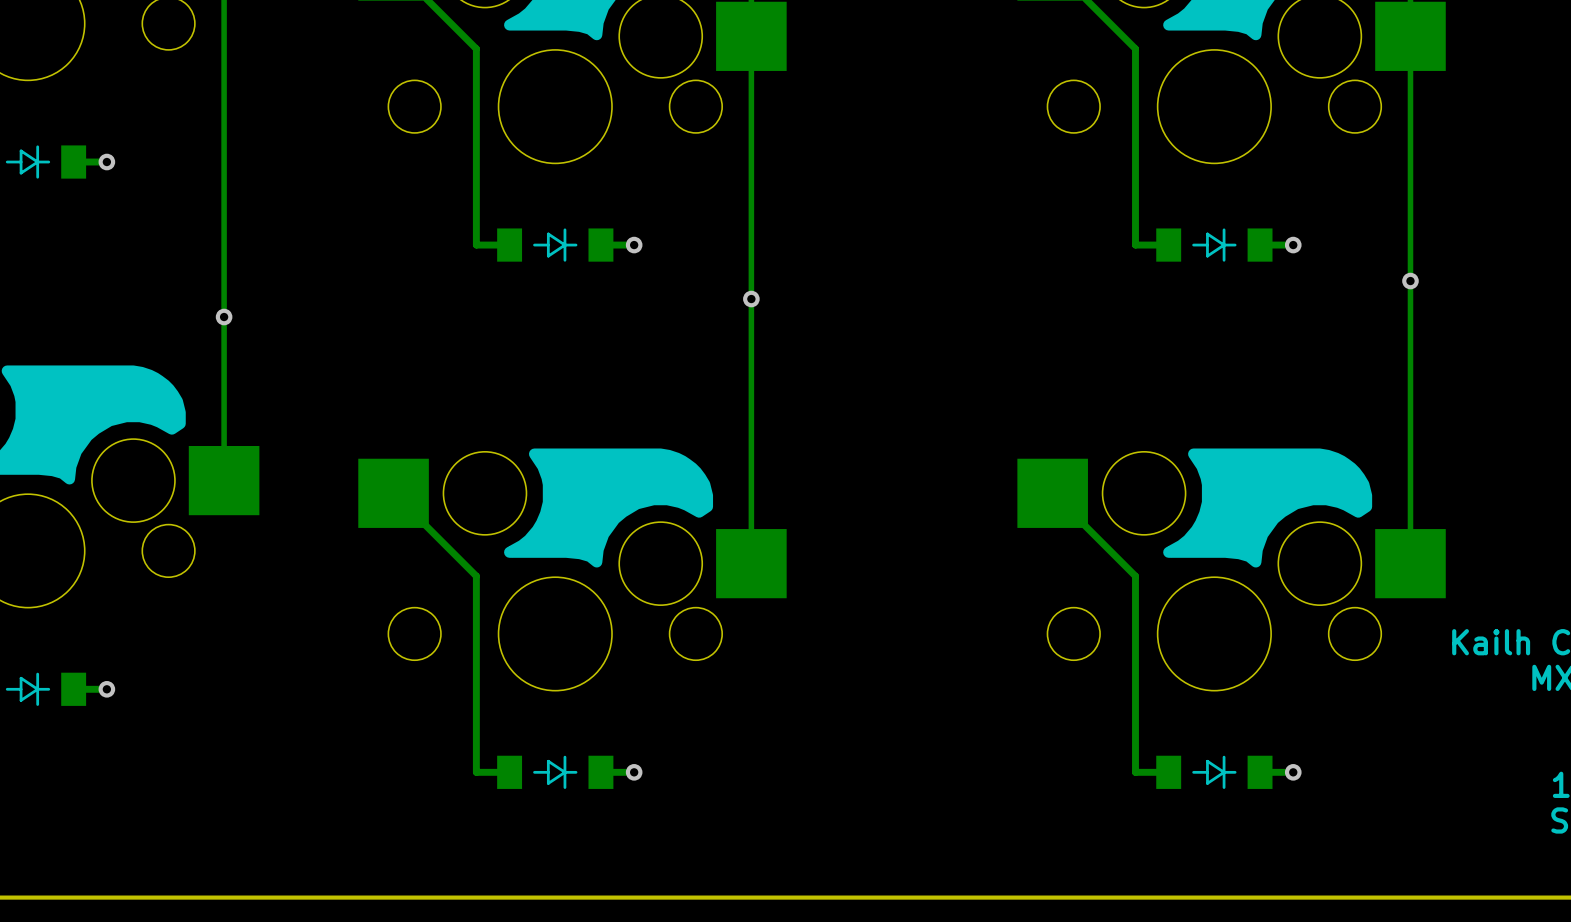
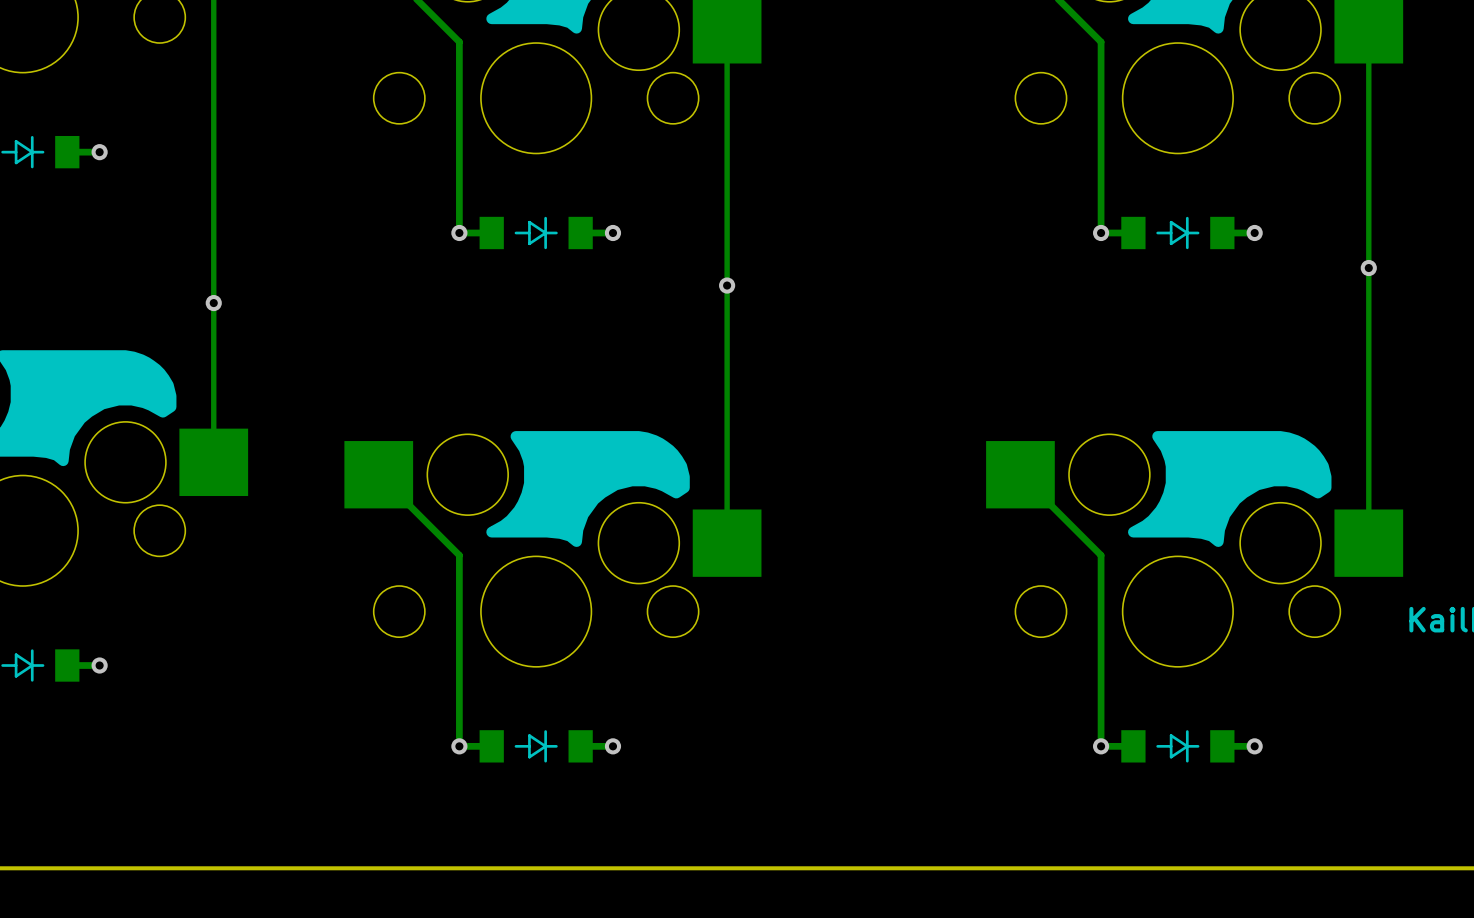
via: none -> (459, 232)
via: none -> (1101, 232)
via: none -> (459, 746)
via: none -> (1101, 746)

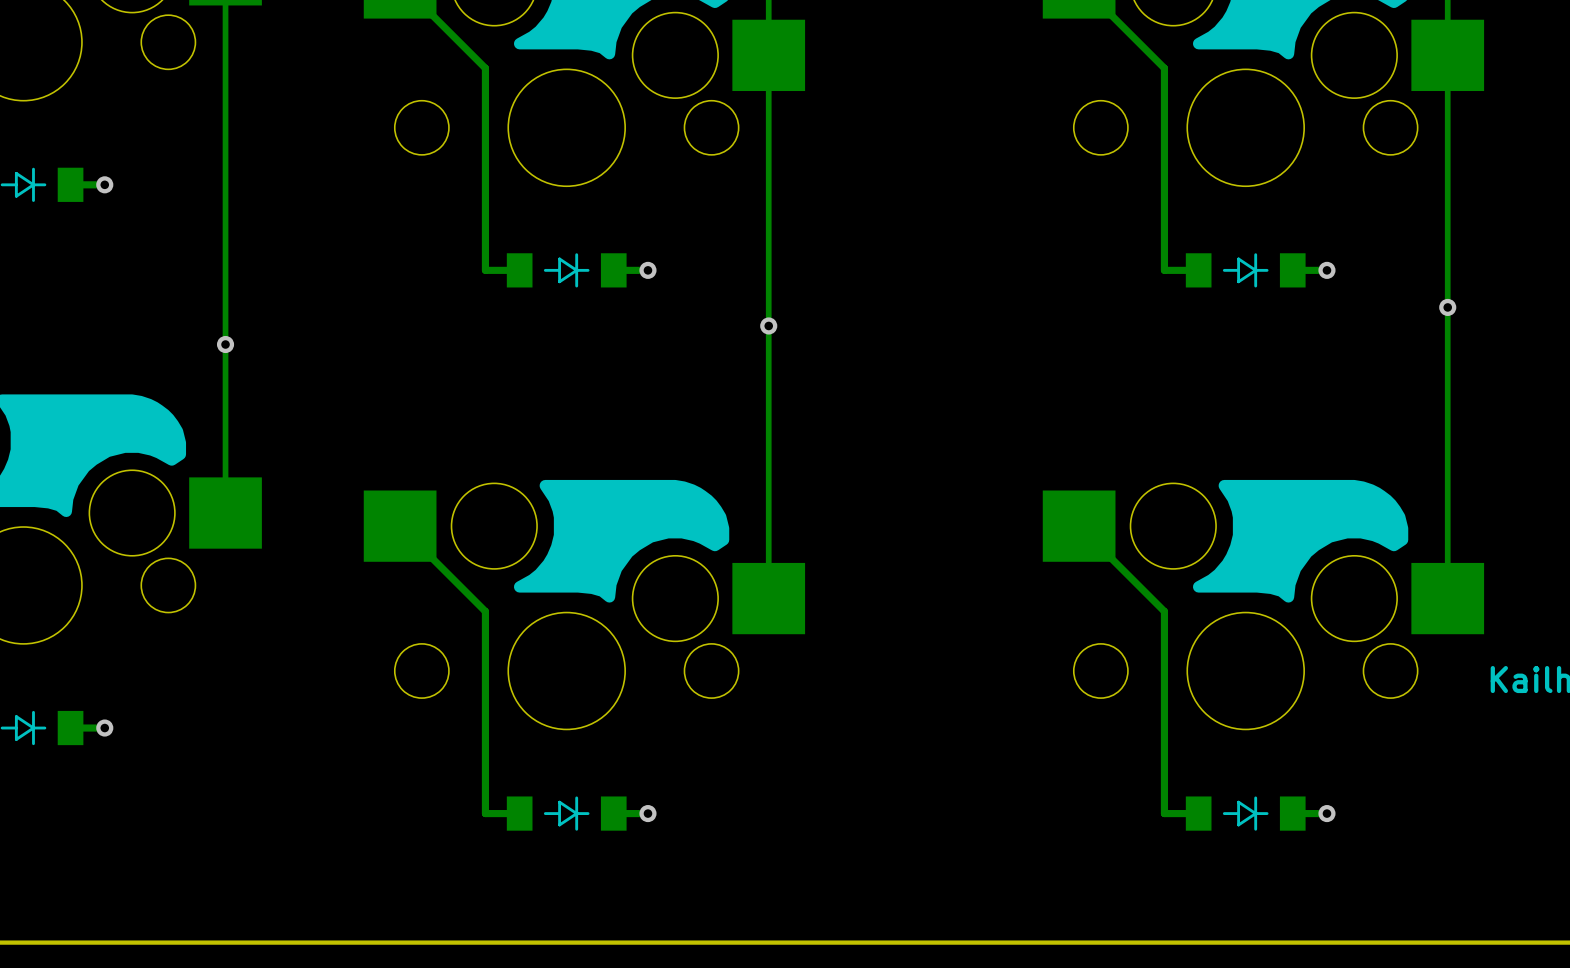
via: (459, 232) -> none
via: (1101, 232) -> none
via: (459, 746) -> none
via: (1101, 746) -> none

